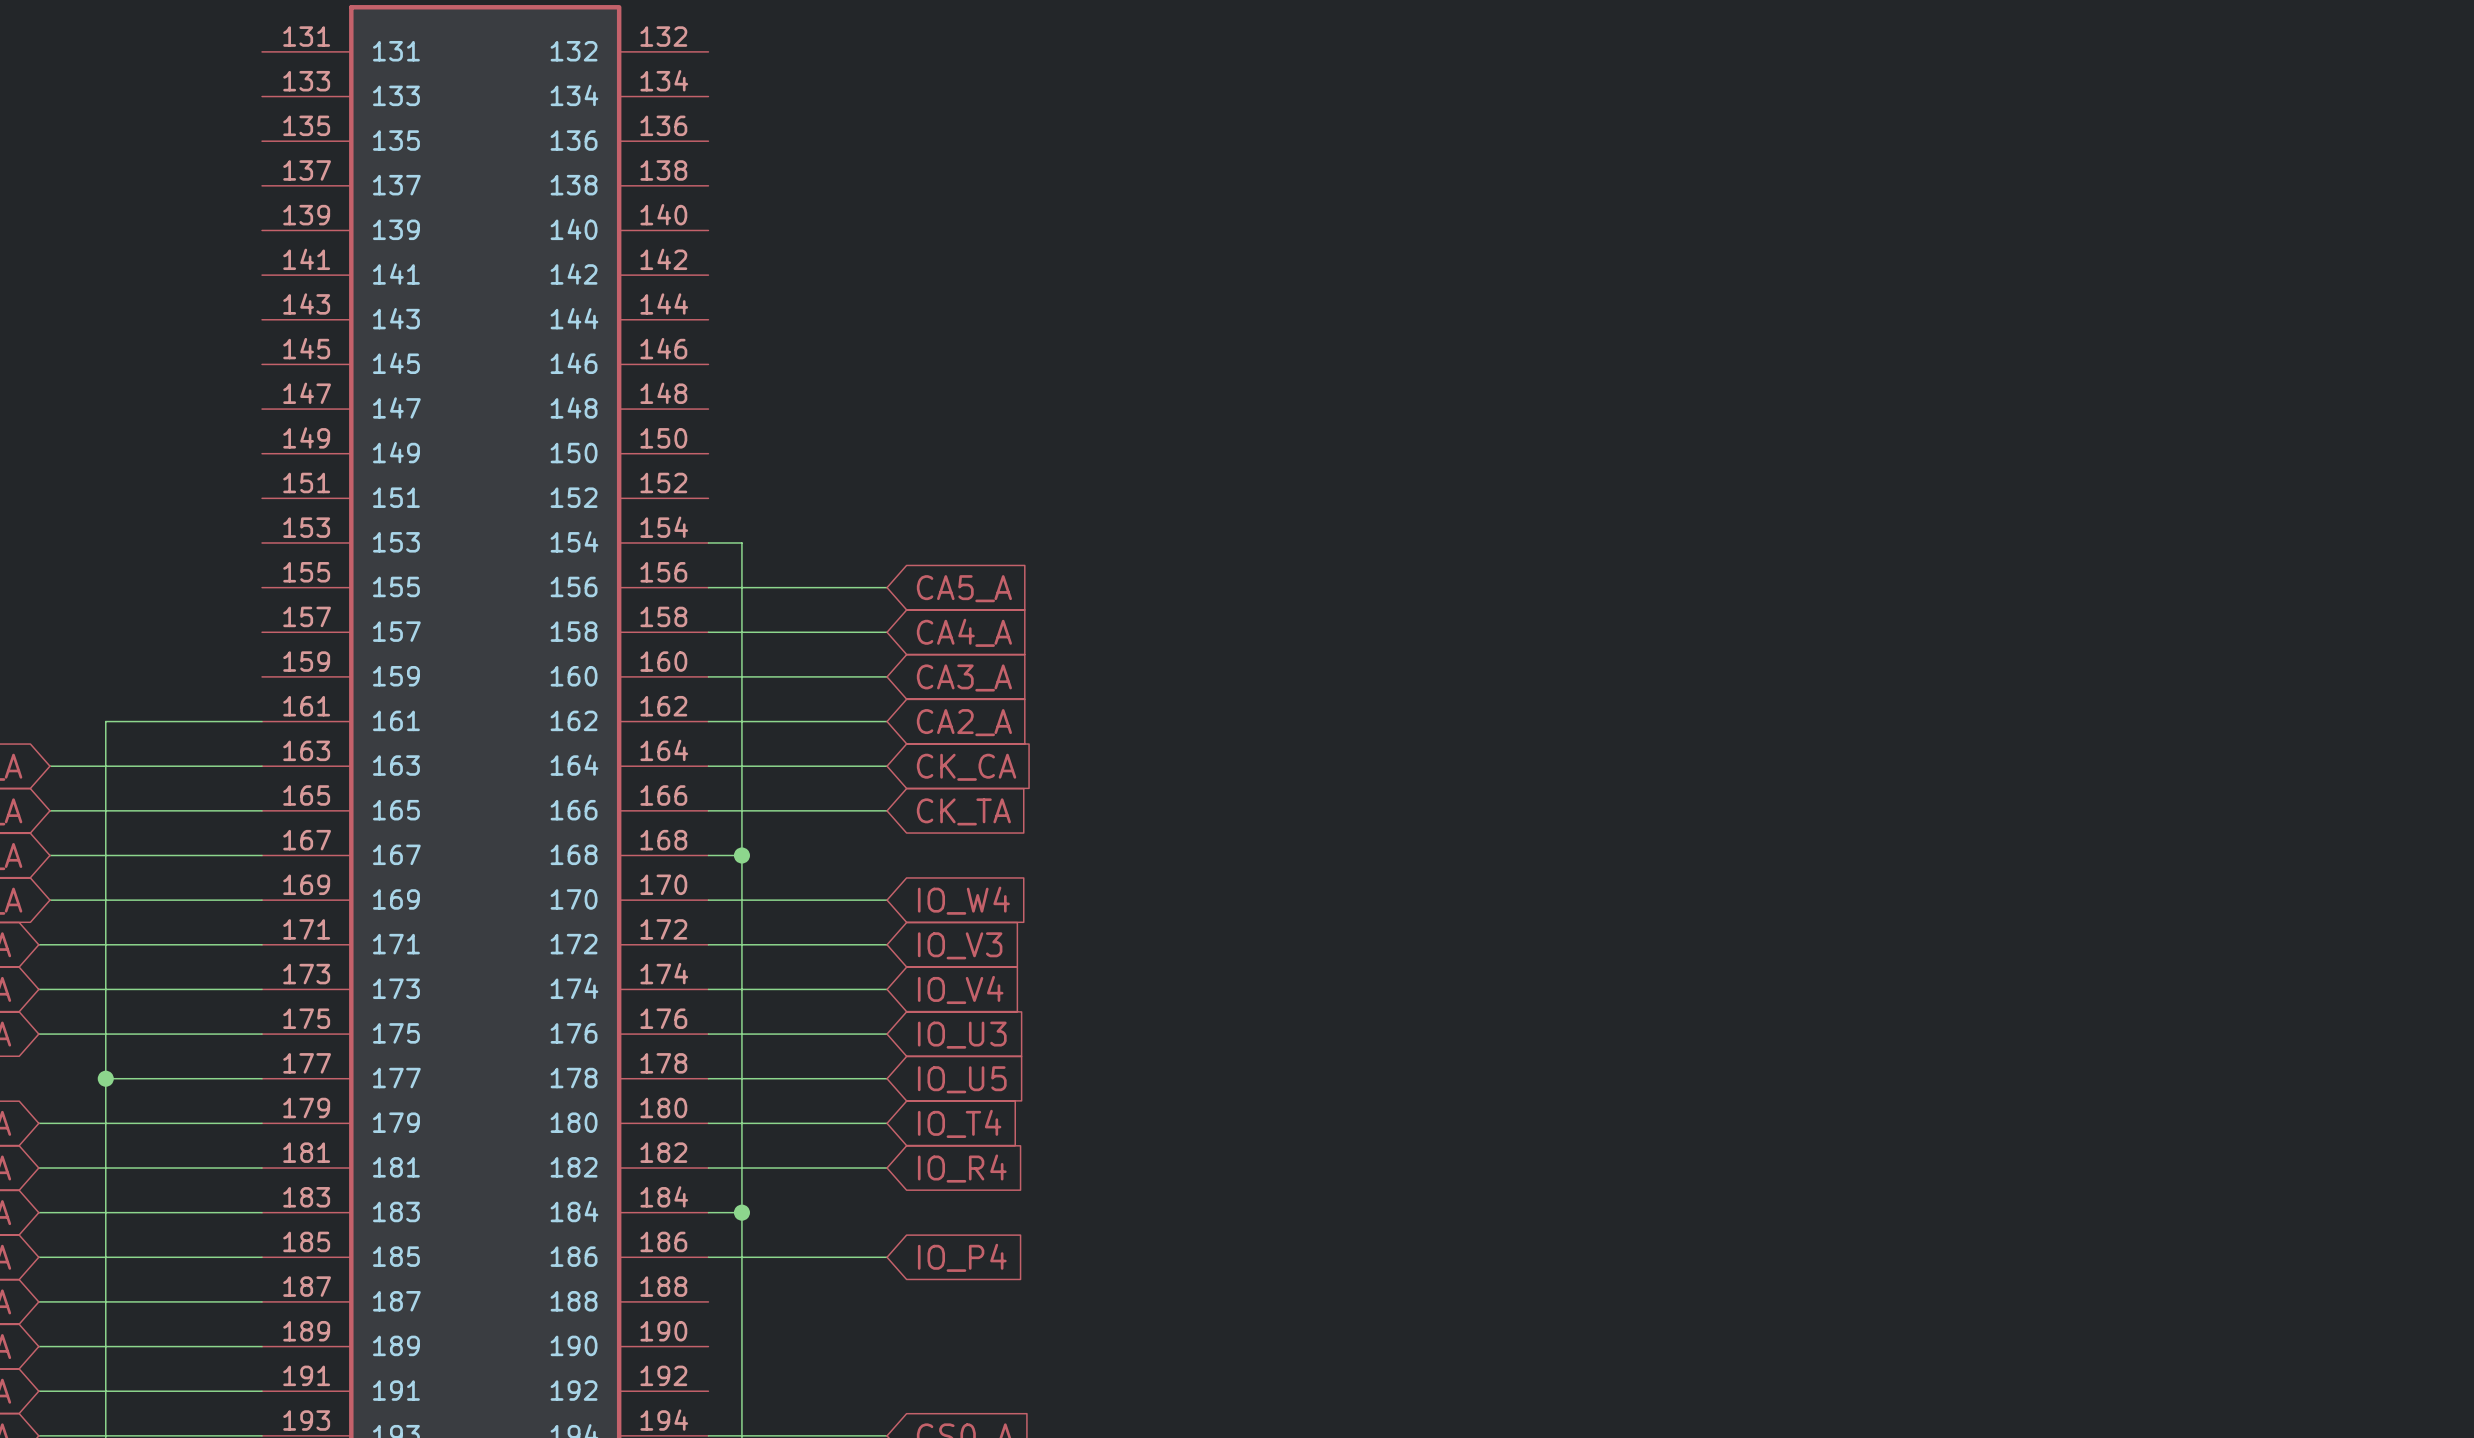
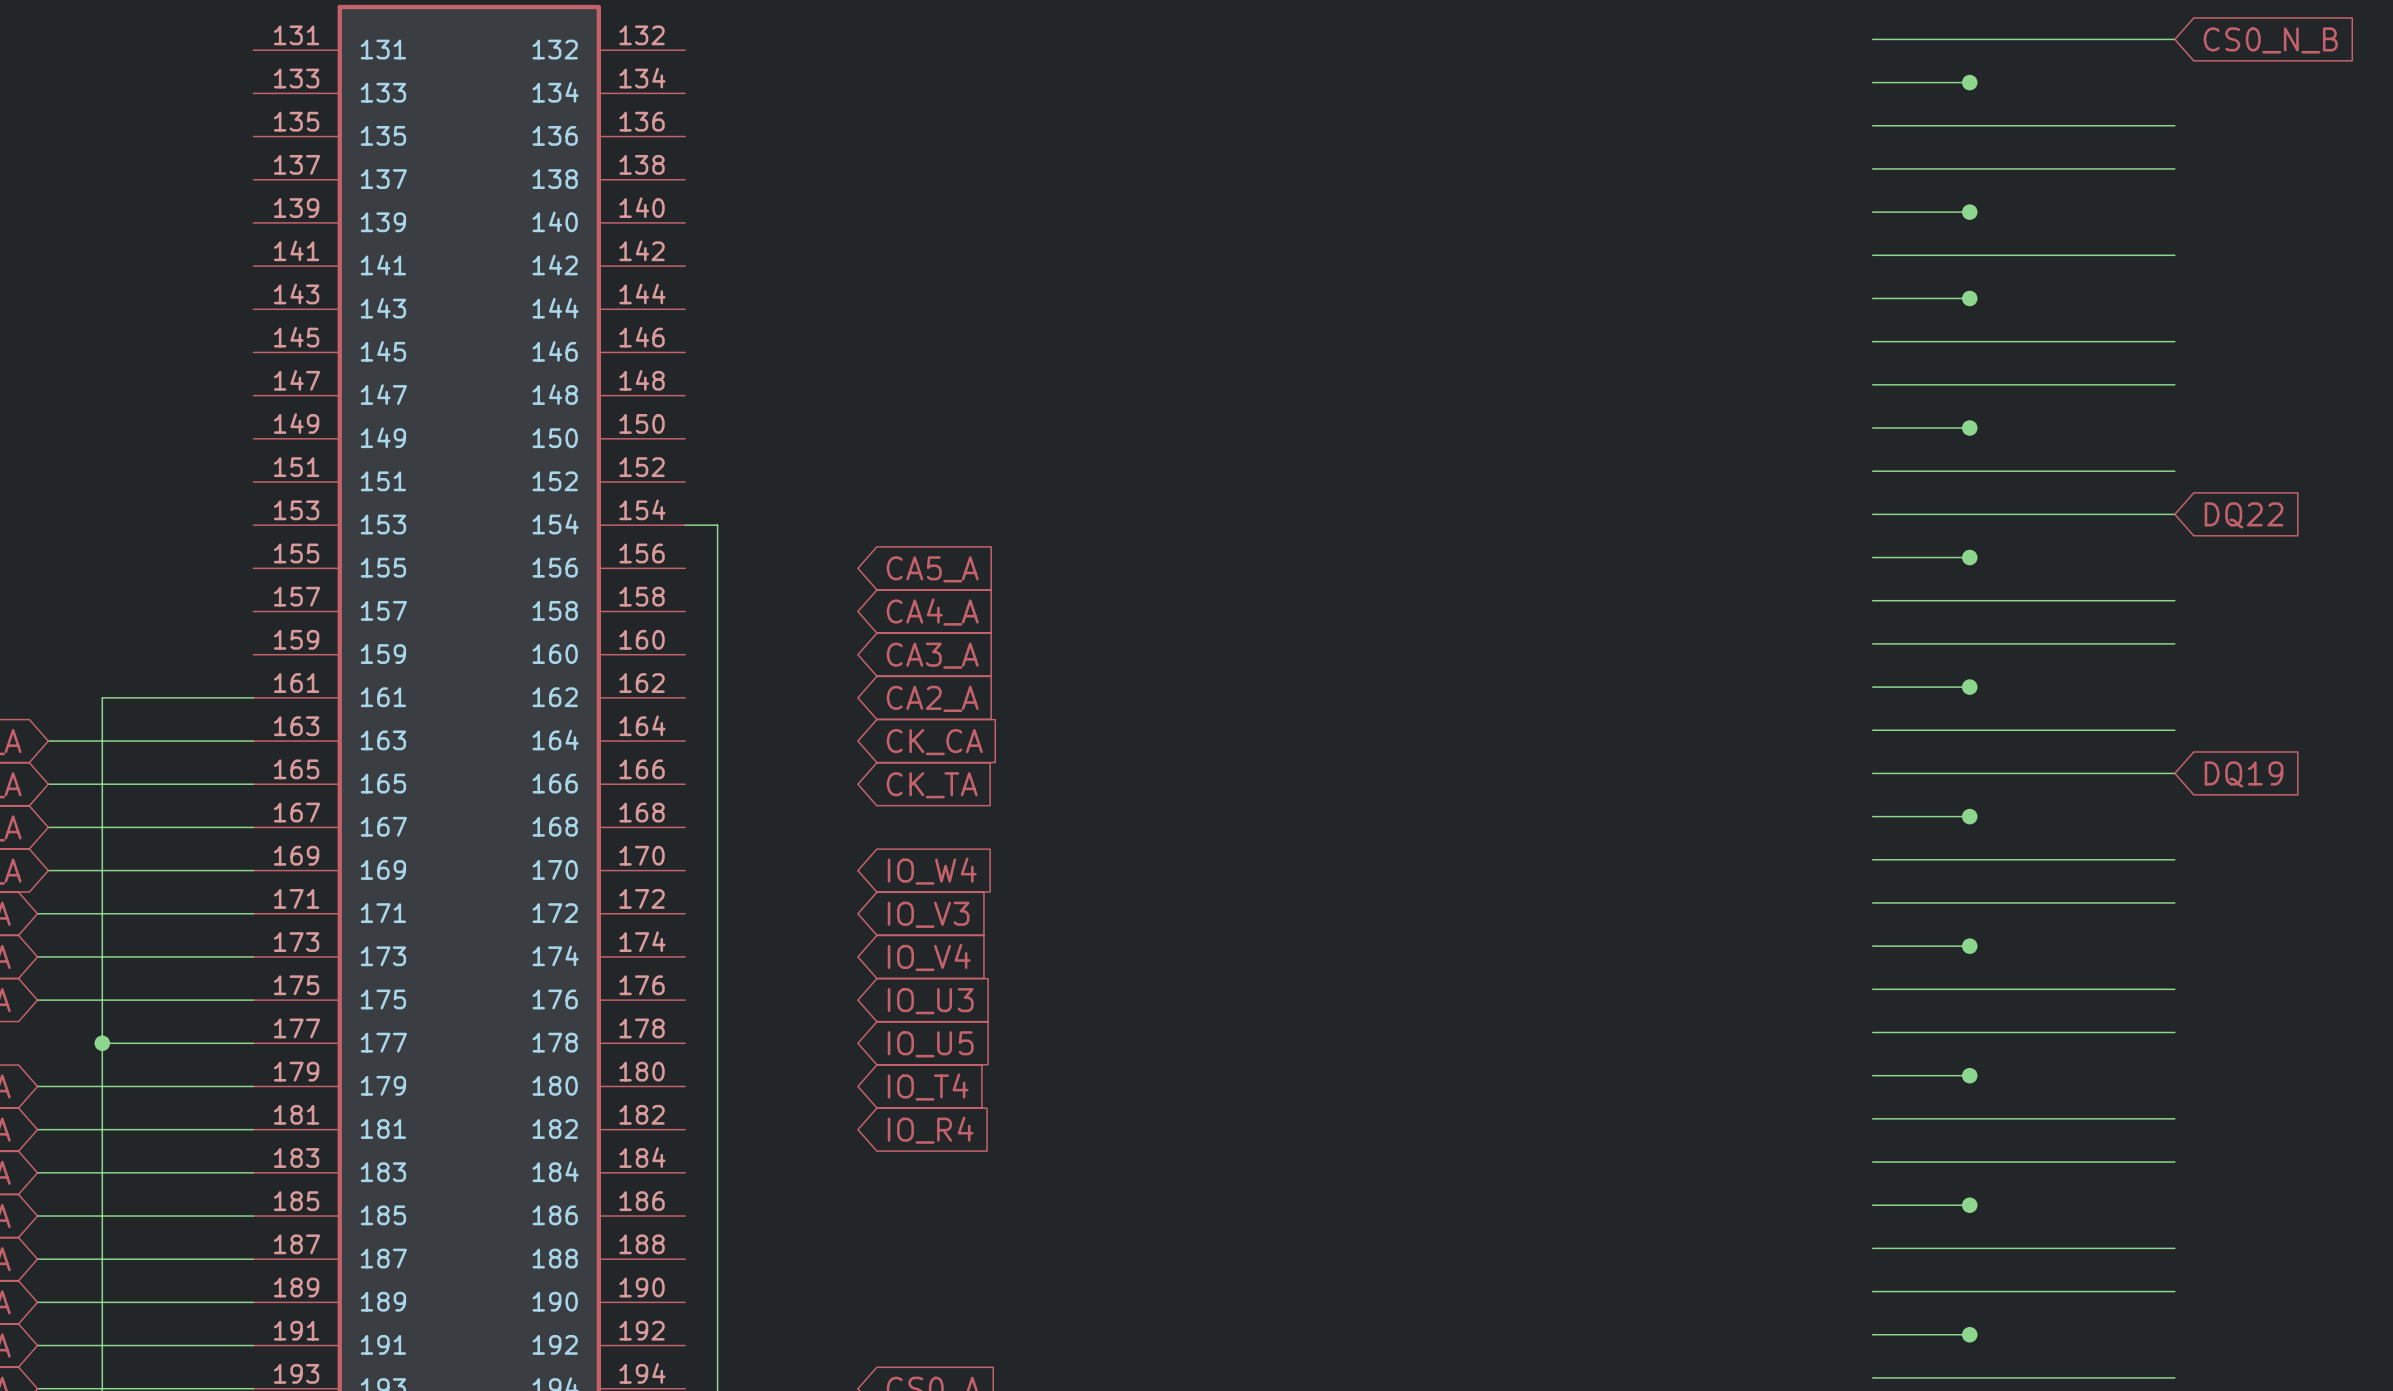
wire: none -> (1872, 39) (2174, 39)
global label: none -> CS0_N_B (2270, 40)
wire: none -> (1872, 82) (1969, 82)
junction: none -> (1969, 82)
wire: none -> (1872, 125) (2174, 125)
wire: none -> (1872, 168) (2174, 168)
wire: none -> (1872, 212) (1969, 212)
junction: none -> (1969, 212)
wire: none -> (1872, 255) (2174, 255)
wire: none -> (1872, 298) (1969, 298)
junction: none -> (1969, 298)
wire: none -> (1872, 341) (2174, 341)
wire: none -> (1872, 384) (2174, 384)
wire: none -> (1872, 428) (1969, 428)
junction: none -> (1969, 428)
wire: none -> (1872, 471) (2174, 471)
wire: none -> (1872, 514) (2174, 514)
global label: none -> DQ22 (2244, 515)
wire: none -> (1872, 557) (1969, 557)
junction: none -> (1969, 557)
wire: (708, 587) (887, 587) -> none
wire: none -> (1872, 600) (2174, 600)
wire: (708, 632) (887, 632) -> none
wire: none -> (1872, 643) (2174, 643)
wire: (708, 676) (887, 676) -> none
wire: none -> (1872, 687) (1969, 687)
junction: none -> (1969, 687)
wire: (708, 721) (887, 721) -> none
wire: none -> (1872, 730) (2174, 730)
wire: (708, 766) (887, 766) -> none
wire: none -> (1872, 773) (2174, 773)
global label: none -> DQ19 (2244, 774)
wire: (708, 810) (887, 810) -> none
wire: none -> (1872, 816) (1969, 816)
junction: none -> (1969, 816)
wire: (708, 855) (741, 855) -> none
junction: (741, 855) -> none
wire: none -> (1872, 859) (2174, 859)
wire: (708, 900) (887, 900) -> none
wire: none -> (1872, 902) (2174, 902)
wire: (708, 944) (887, 944) -> none
wire: none -> (1872, 946) (1969, 946)
junction: none -> (1969, 946)
wire: (708, 989) (887, 989) -> none
wire: none -> (1872, 989) (2174, 989)
wire: (708, 1034) (887, 1034) -> none
wire: none -> (1872, 1032) (2174, 1032)
wire: (708, 1078) (887, 1078) -> none
wire: none -> (1872, 1075) (1969, 1075)
junction: none -> (1969, 1075)
wire: (708, 1123) (887, 1123) -> none
wire: none -> (1872, 1118) (2174, 1118)
wire: (708, 1168) (887, 1168) -> none
wire: none -> (1872, 1162) (2174, 1162)
wire: (708, 1212) (741, 1212) -> none
junction: (741, 1212) -> none
wire: none -> (1872, 1205) (1969, 1205)
junction: none -> (1969, 1205)
wire: (708, 1257) (887, 1257) -> none
global label: IO_P4 (962, 1257) -> none
wire: none -> (1872, 1248) (2174, 1248)
wire: none -> (1872, 1291) (2174, 1291)
wire: none -> (1872, 1334) (1969, 1334)
junction: none -> (1969, 1334)
wire: none -> (1872, 1377) (2174, 1377)
wire: (708, 1435) (887, 1435) -> none

